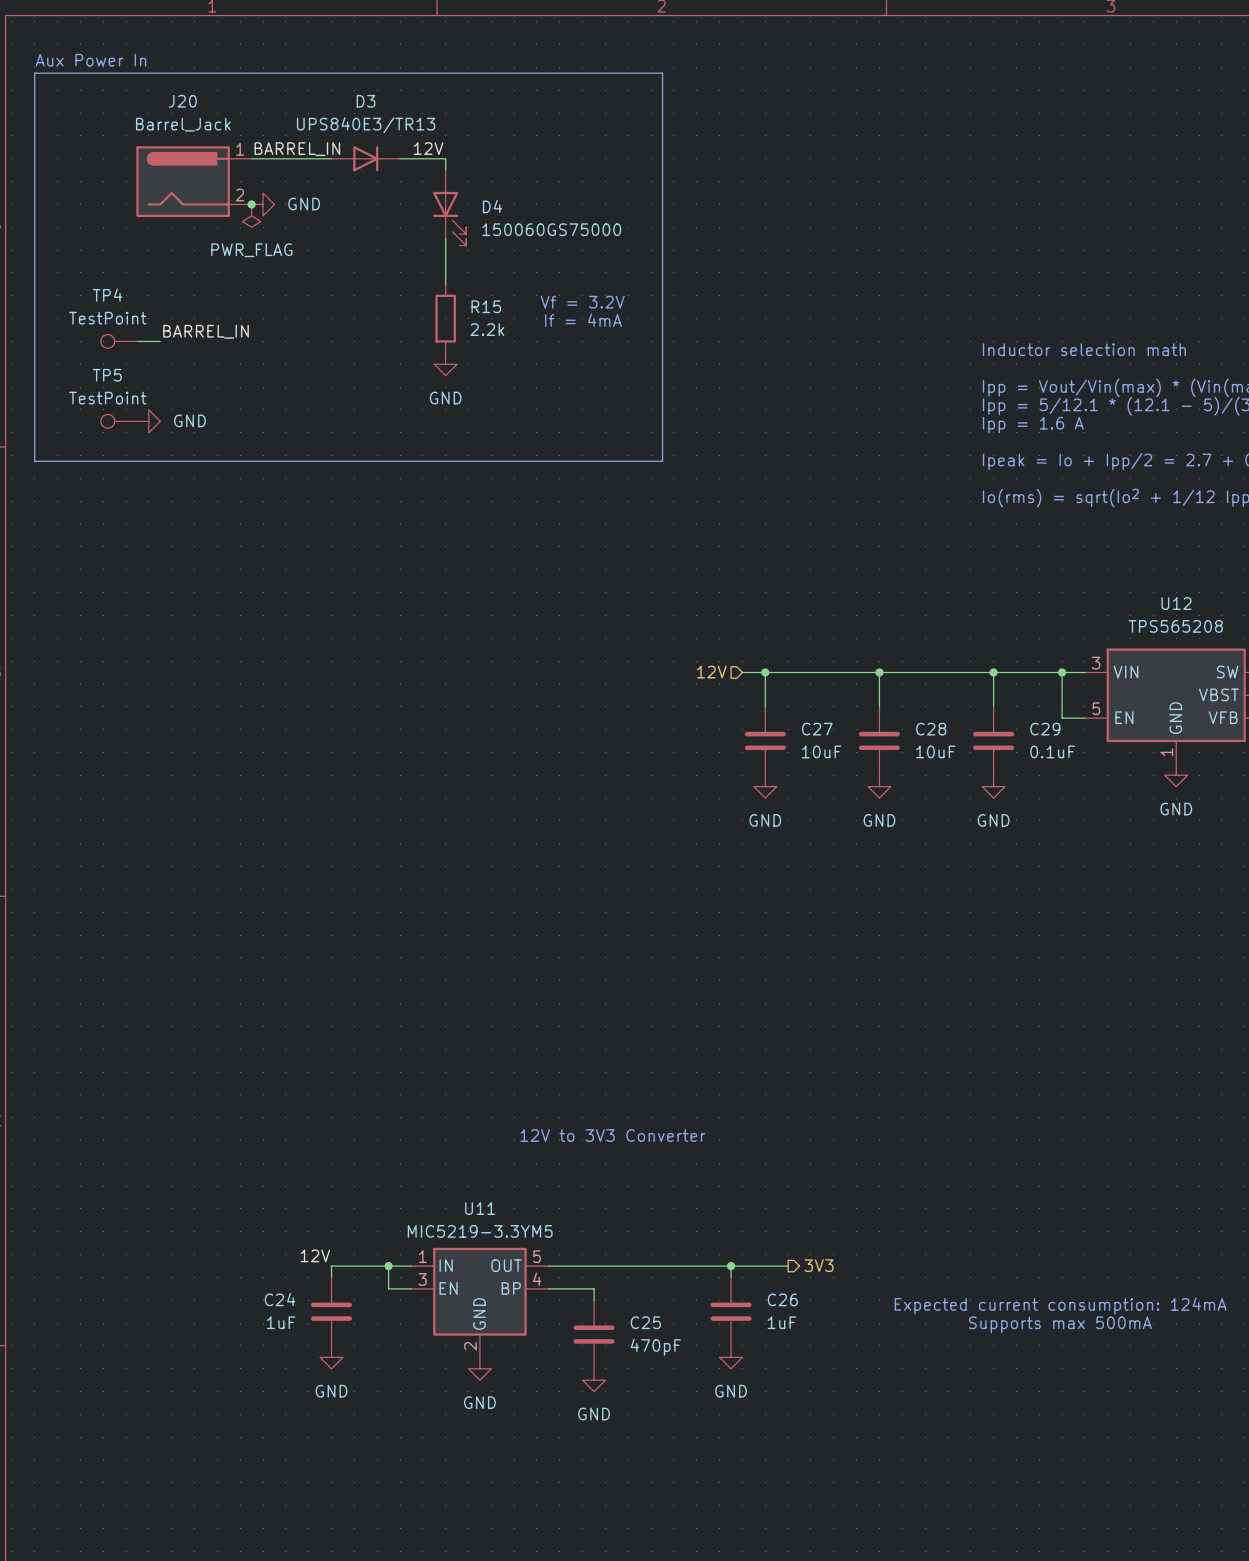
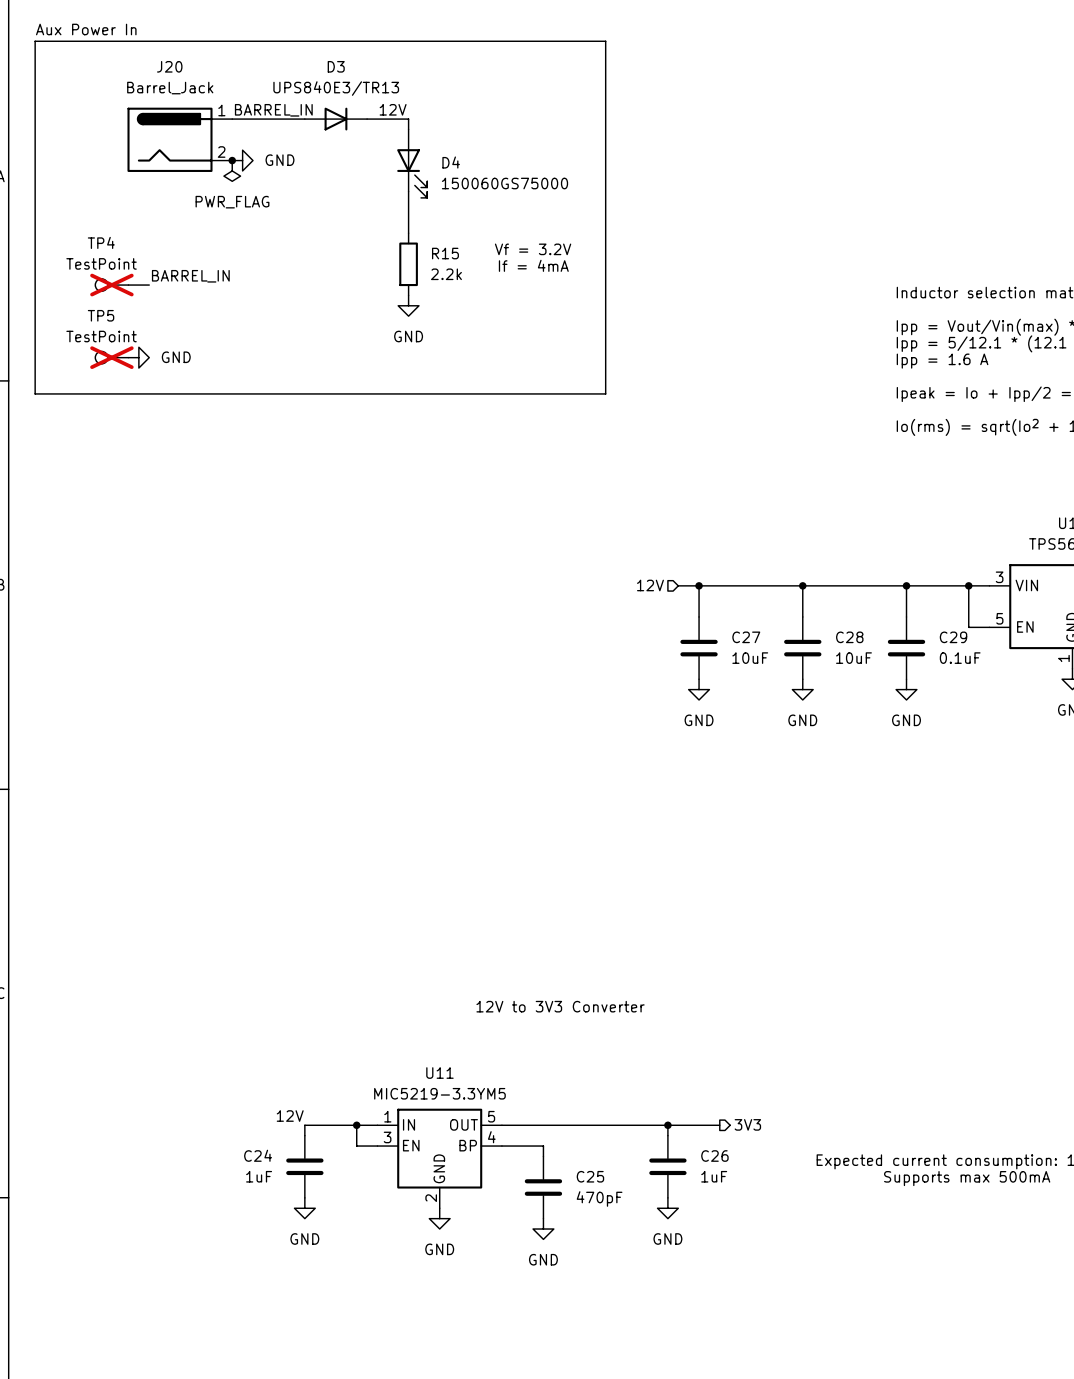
TP4 do-not-place cross: none -> (111, 285)
TP5 do-not-place cross: none -> (111, 357)

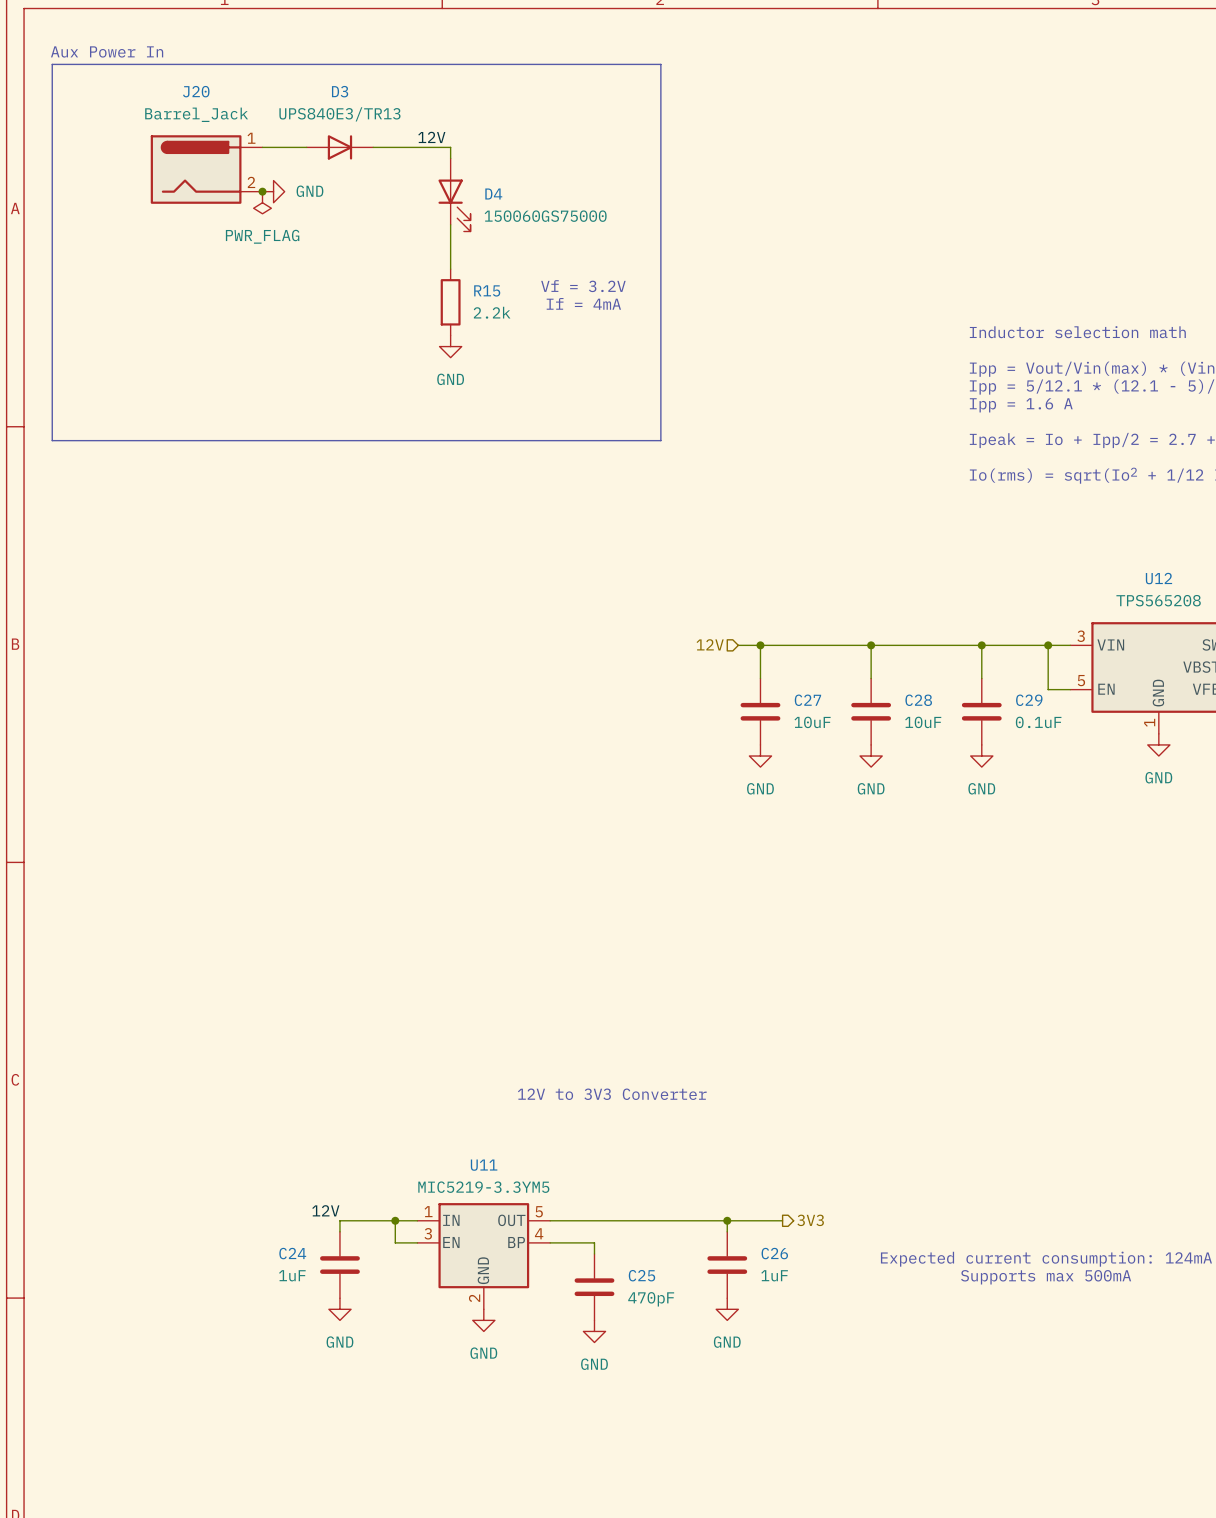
label: BARREL_IN (273, 110) -> none
D3 position: (335, 119) -> (339, 147)
label: BARREL_IN (190, 276) -> none
TP4: TestPoint (111, 285) -> none
wire: (128, 285) (149, 285) -> none
TP5: TestPoint (111, 357) -> none
power symbol: GND (138, 357) -> none

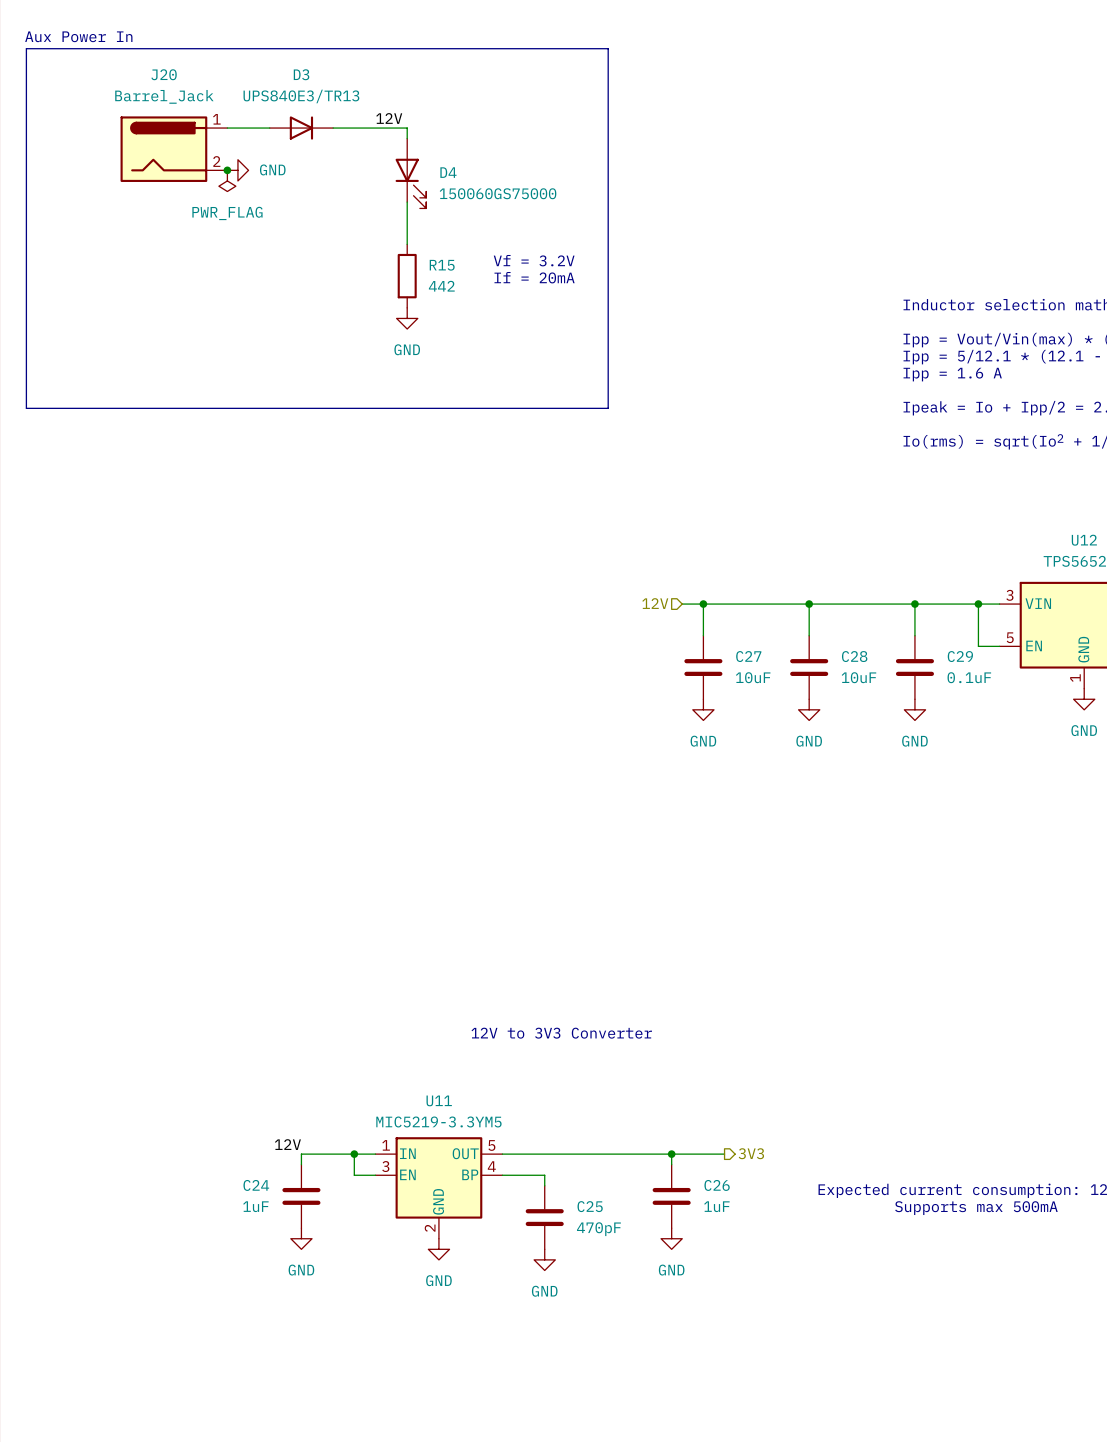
text: If = 4mA (583, 303) -> If = 20mA (534, 277)
R15 value: 2.2k (492, 312) -> 442 (441, 286)

